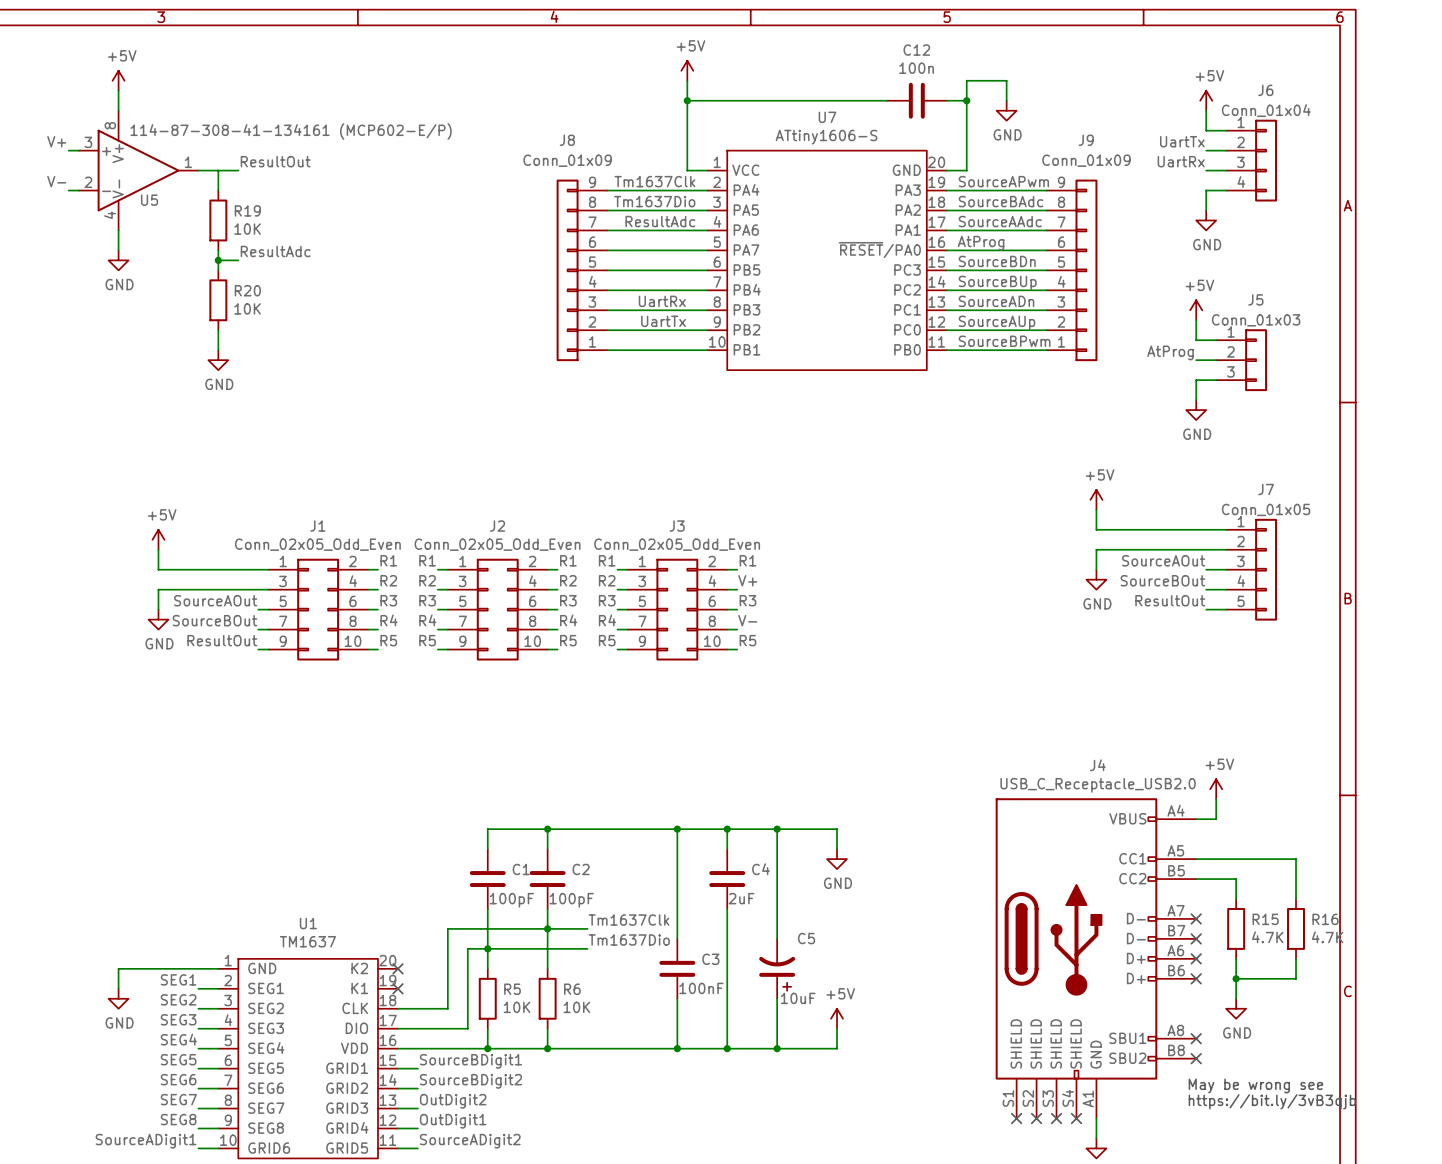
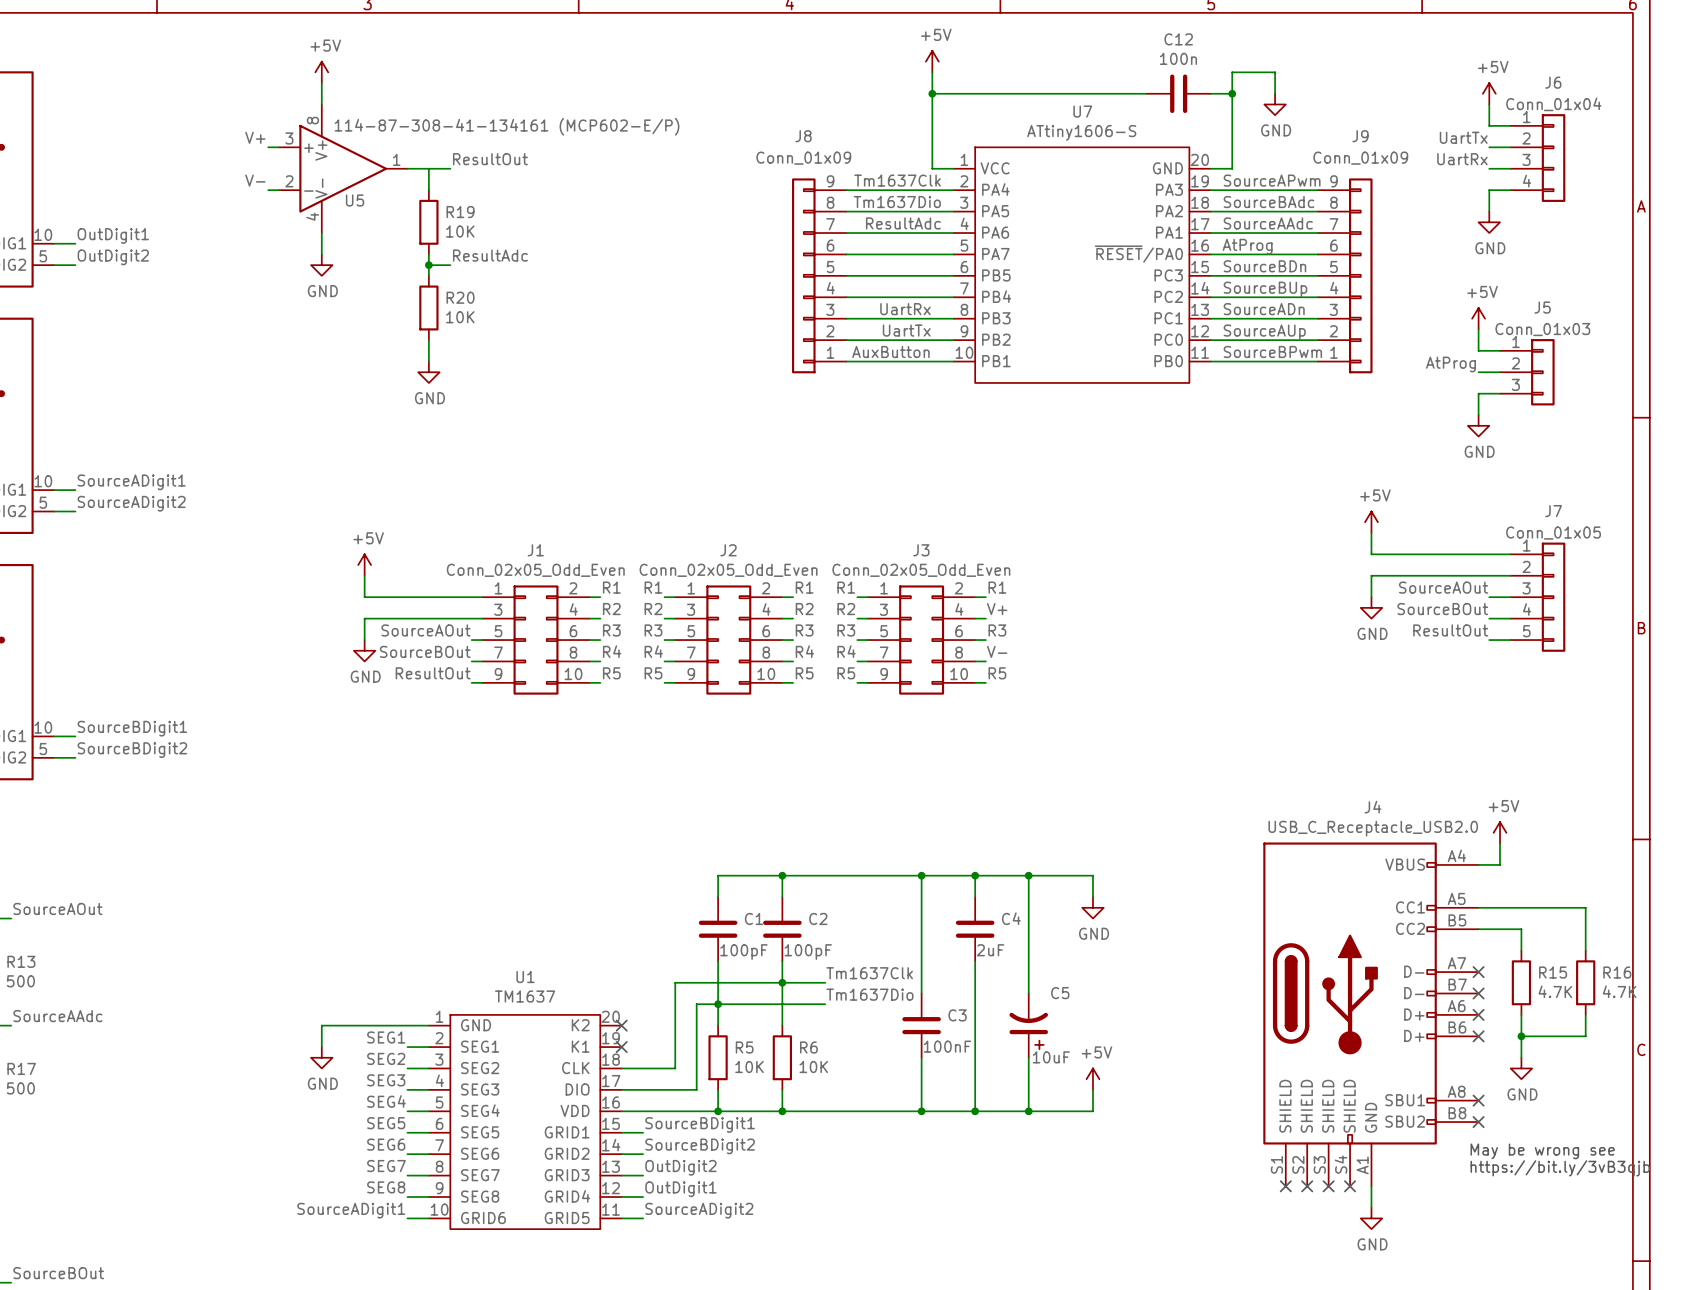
label: none -> AuxButton (890, 351)

